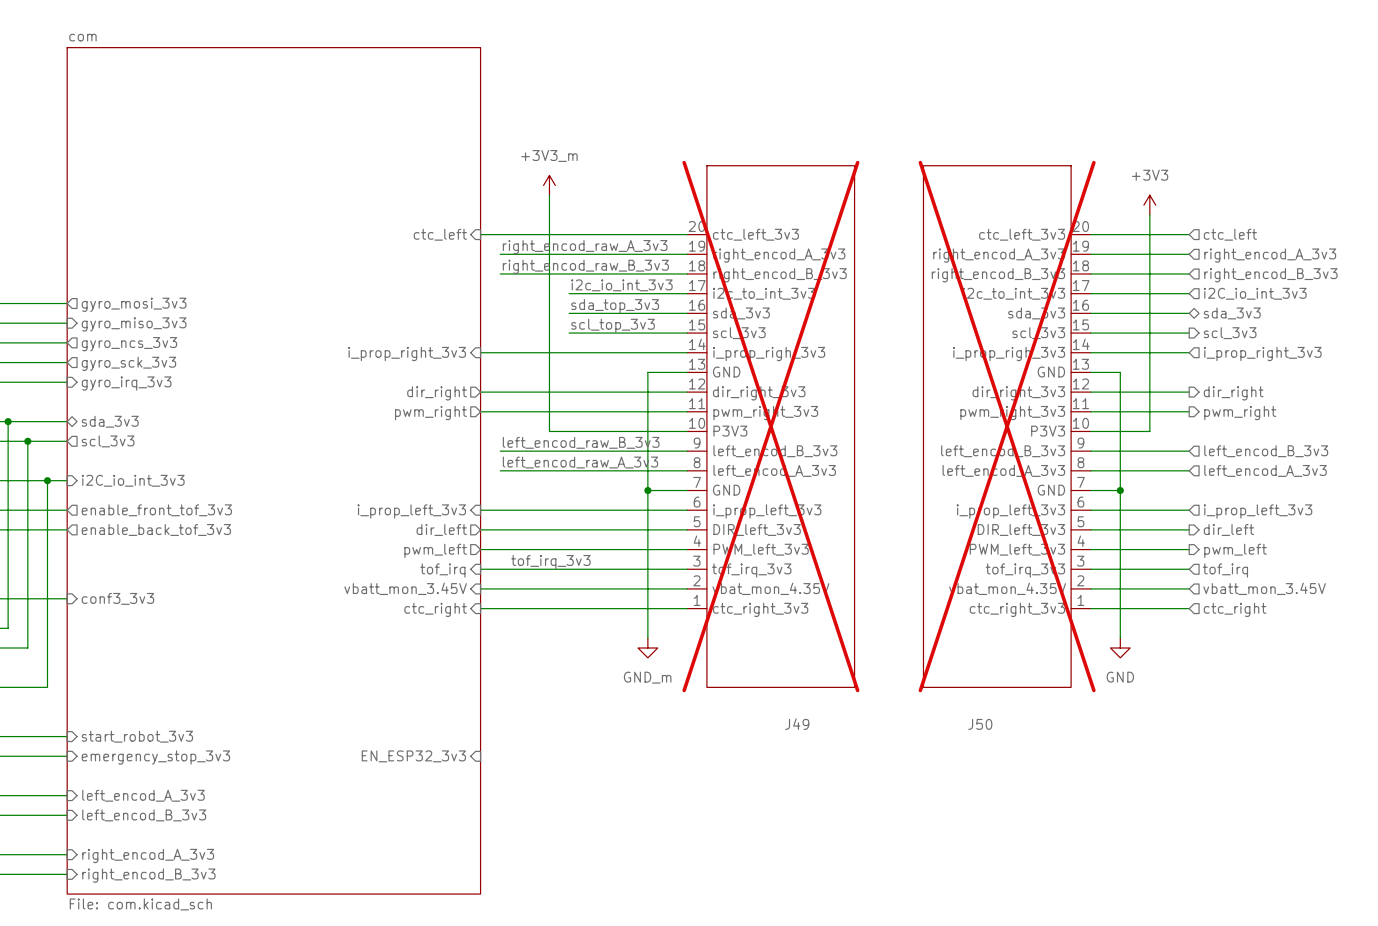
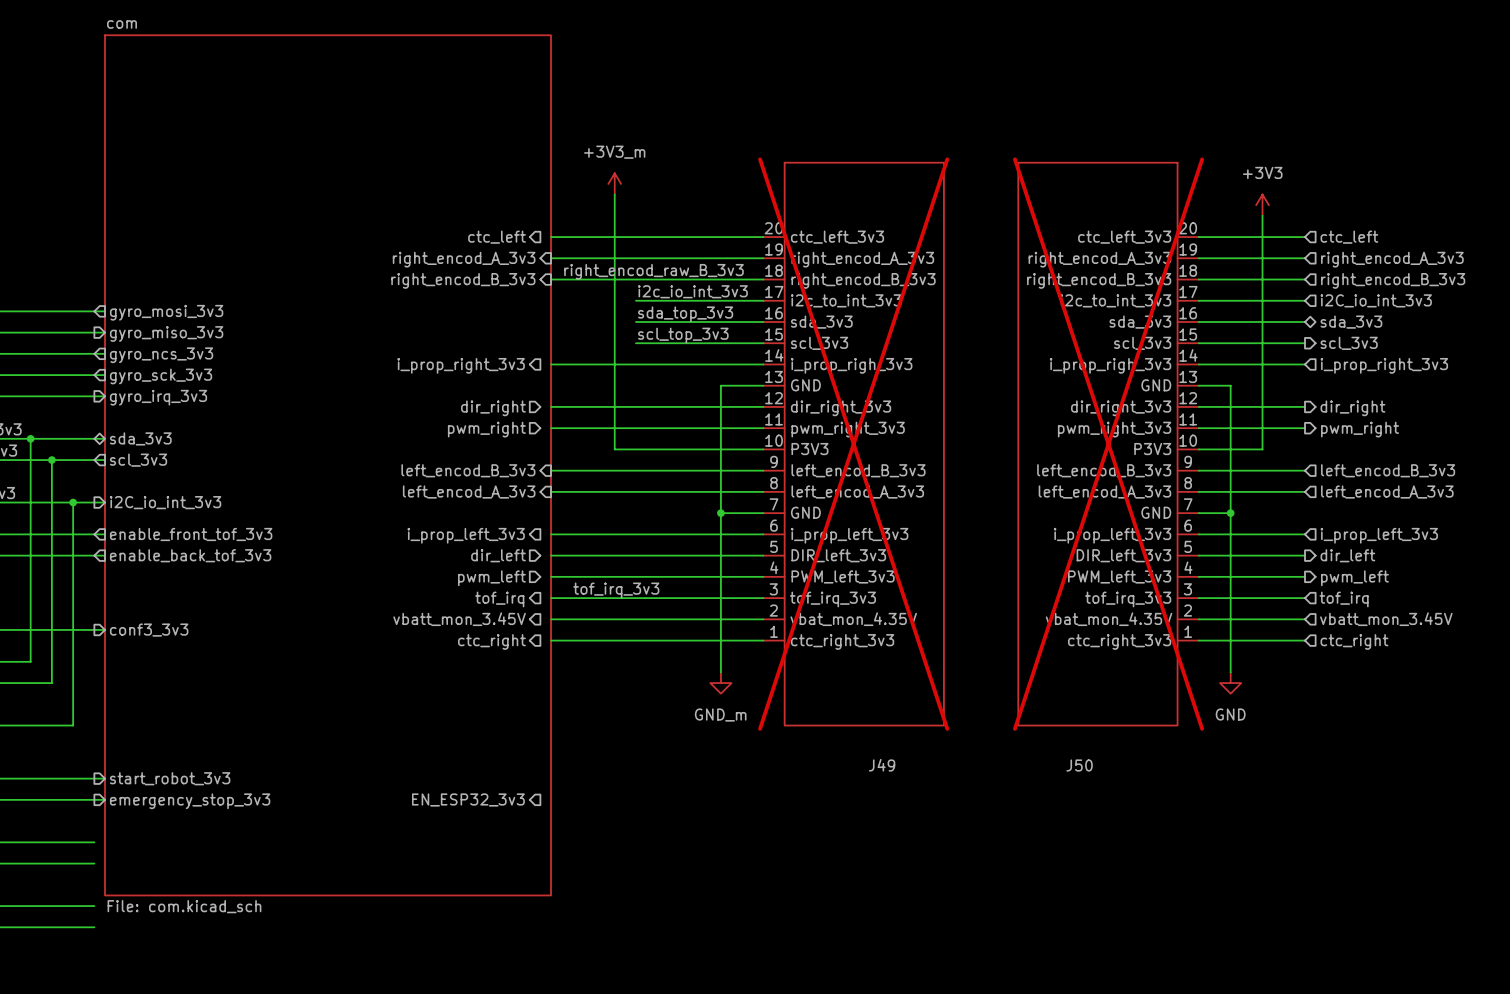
wire: (480, 234) (490, 234) -> none
label: right_encod_raw_A_3v3 (585, 247) -> none
sheet pin: none -> right_encod_A_3v3 (464, 259)
sheet pin: none -> right_encod_B_3v3 (463, 280)
wire: none -> (94, 311) (105, 311)
wire: none -> (94, 332) (105, 332)
wire: none -> (94, 353) (105, 353)
wire: (480, 352) (490, 352) -> none
wire: none -> (94, 375) (105, 375)
wire: none -> (94, 396) (105, 396)
wire: (480, 392) (490, 392) -> (551, 258) (561, 258)
wire: (480, 411) (490, 411) -> (551, 279) (561, 279)
wire: none -> (94, 438) (105, 438)
wire: none -> (94, 460) (105, 460)
label: left_encod_raw_B_3v3 (581, 442) -> none
sheet com: none -> File: com.kicad_sch (328, 465)
sheet pin: none -> left_encod_B_3v3 (468, 470)
label: left_encod_raw_A_3v3 (580, 462) -> none
sheet com: File: com.kicad_sch (273, 470) -> none
sheet pin: none -> left_encod_A_3v3 (469, 492)
wire: none -> (94, 502) (105, 502)
wire: none -> (94, 534) (105, 534)
wire: (480, 510) (490, 510) -> none
wire: none -> (94, 555) (105, 555)
wire: (480, 529) (490, 529) -> none
wire: (480, 549) (490, 549) -> none
wire: (480, 569) (490, 569) -> none
wire: (480, 588) (490, 588) -> (551, 470) (561, 470)
wire: none -> (94, 629) (105, 629)
wire: (480, 608) (490, 608) -> (551, 491) (561, 491)
wire: none -> (94, 778) (105, 778)
wire: none -> (94, 799) (105, 799)
sheet pin: left_encod_A_3v3 (143, 795) -> none
sheet pin: left_encod_B_3v3 (144, 815) -> none
sheet pin: right_encod_A_3v3 (148, 855) -> none
sheet pin: right_encod_B_3v3 (148, 875) -> none

